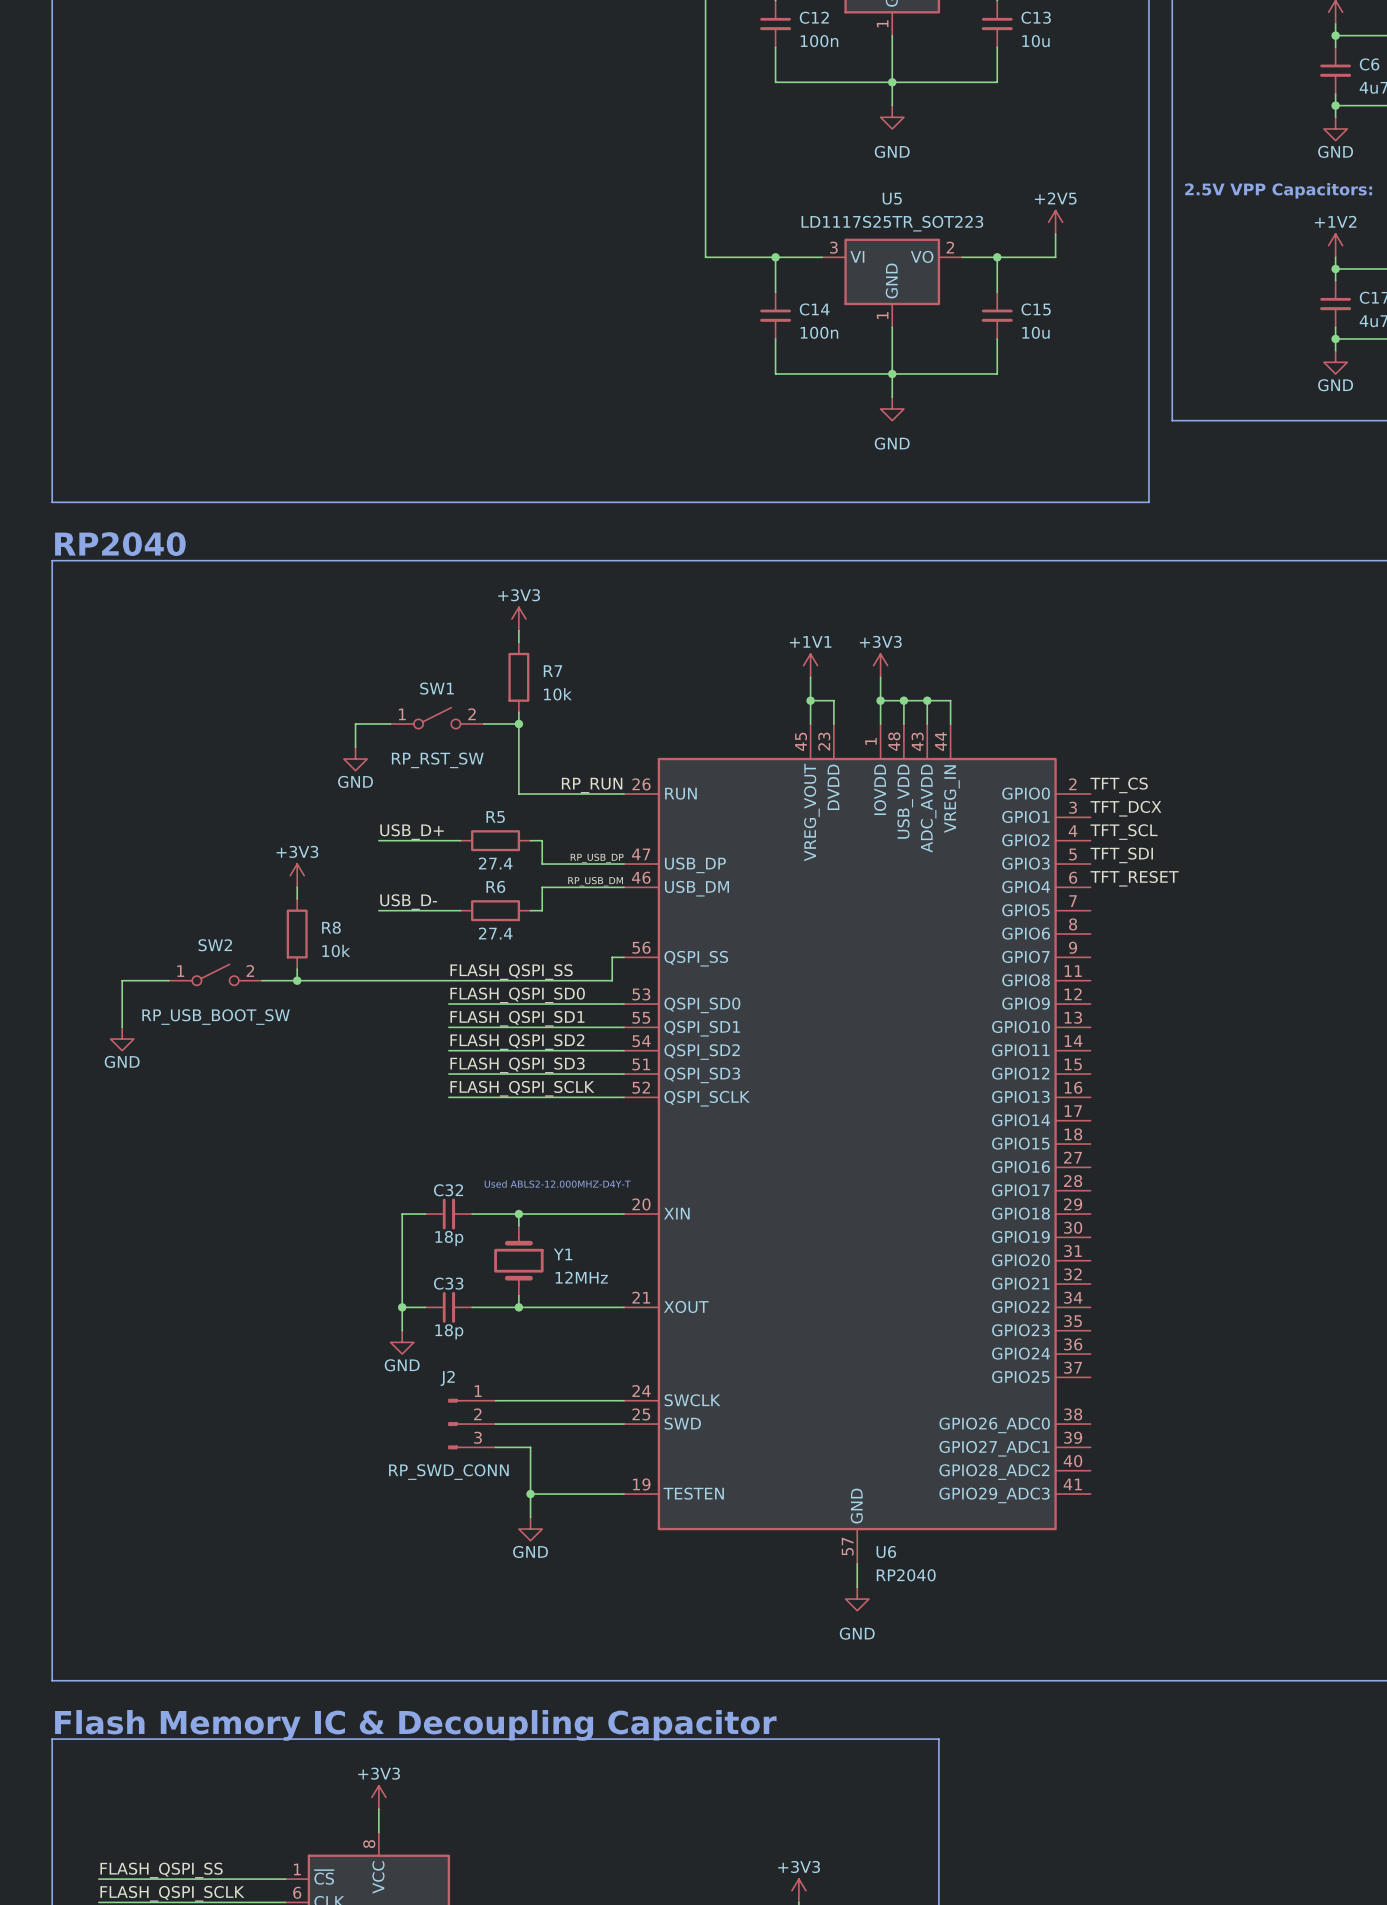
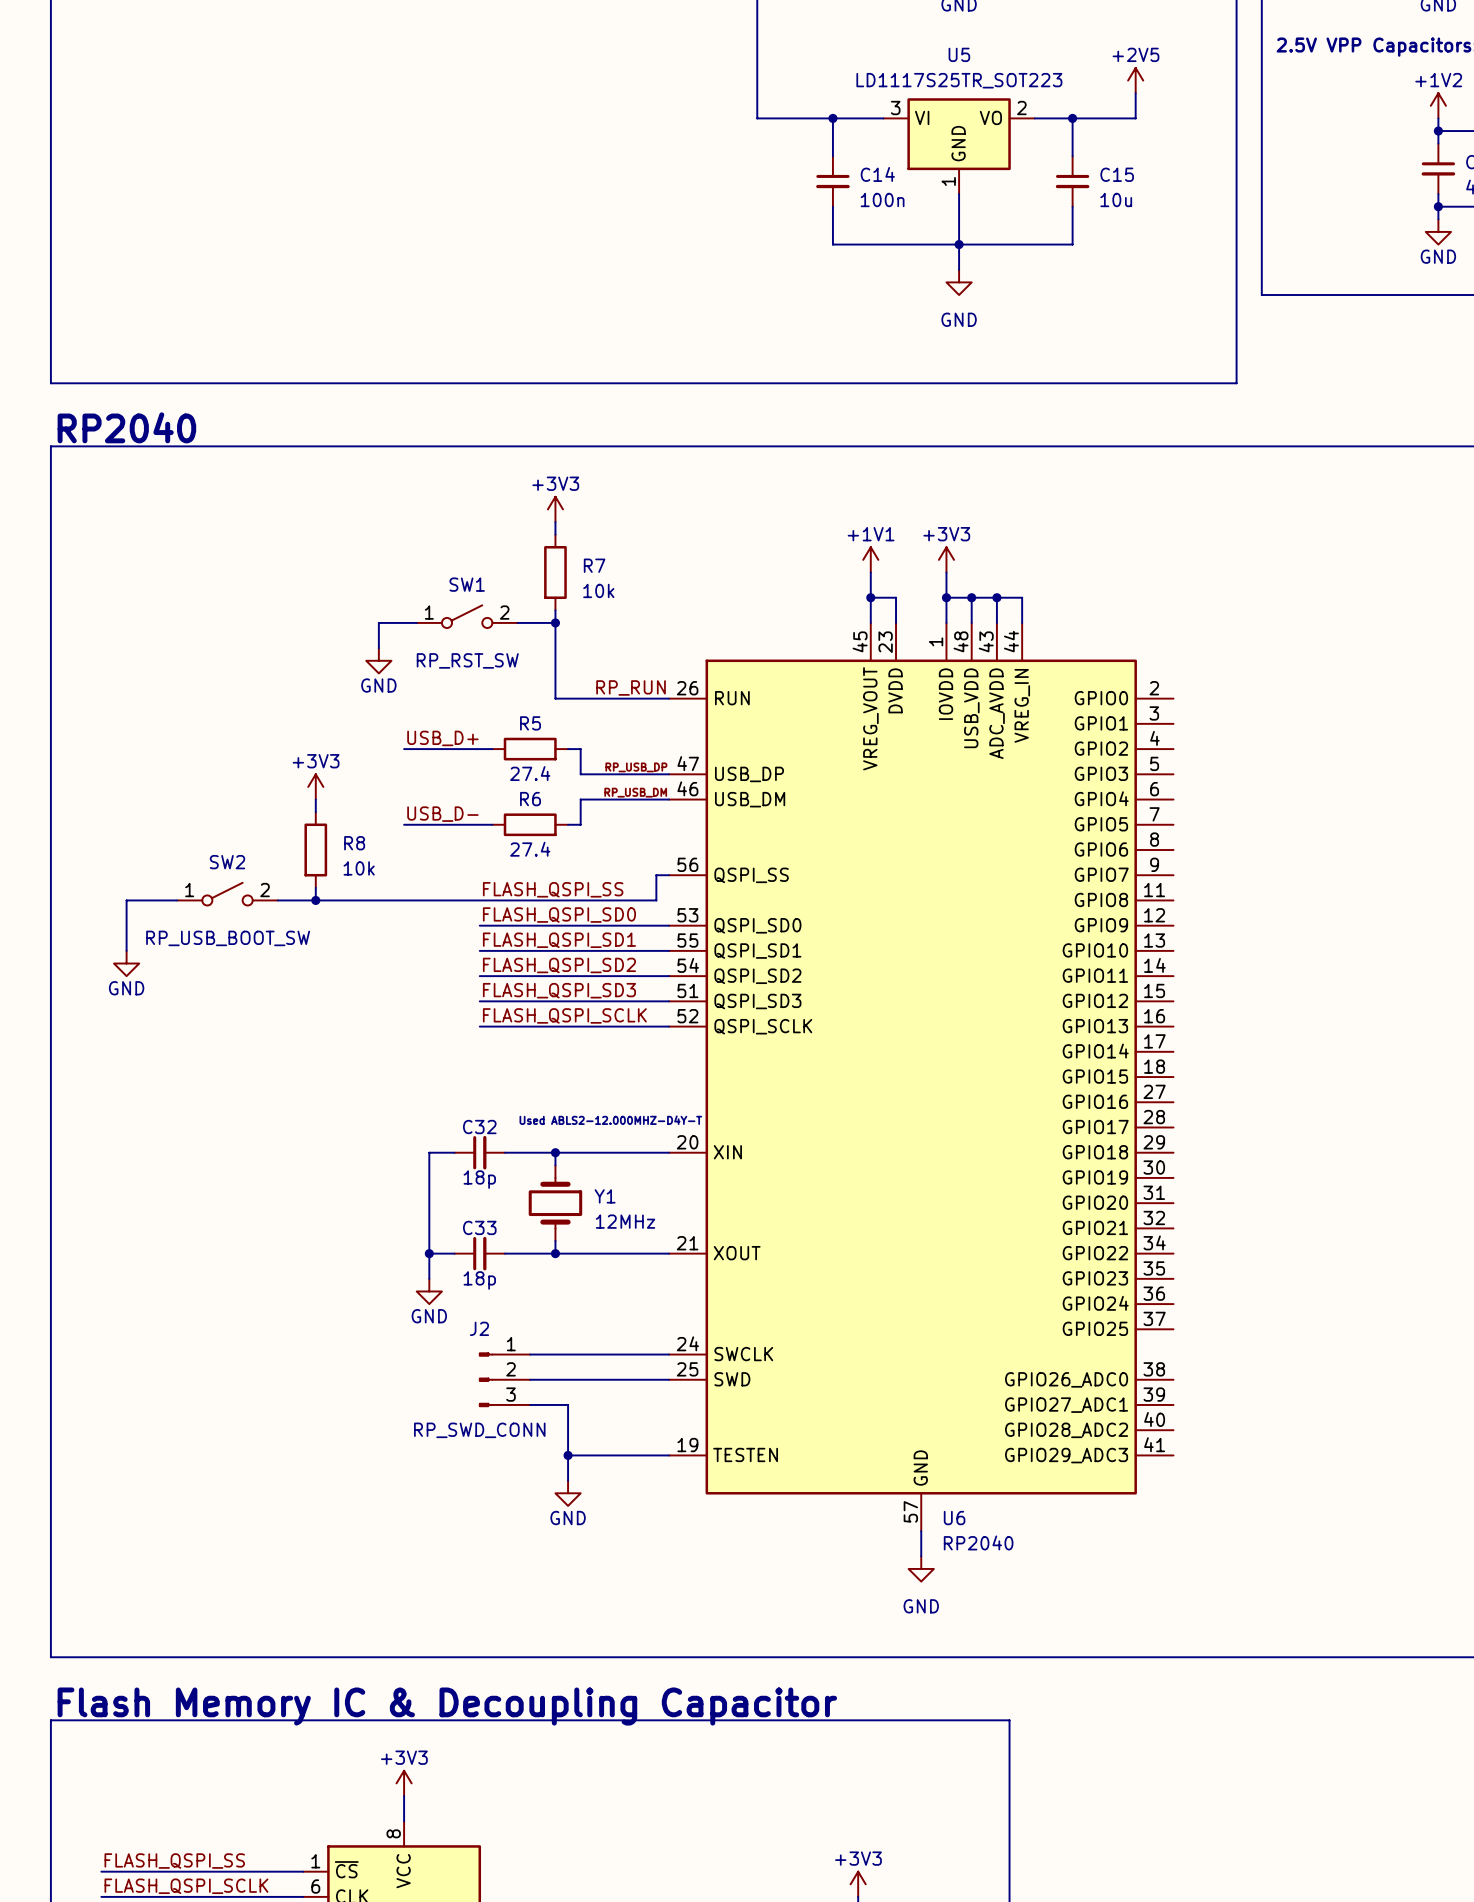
label: TFT_CS (1119, 785) -> none
label: TFT_DCX (1125, 808) -> none
label: TFT_SCL (1124, 832) -> none
label: TFT_SDI (1121, 855) -> none
label: TFT_RESET (1134, 878) -> none

